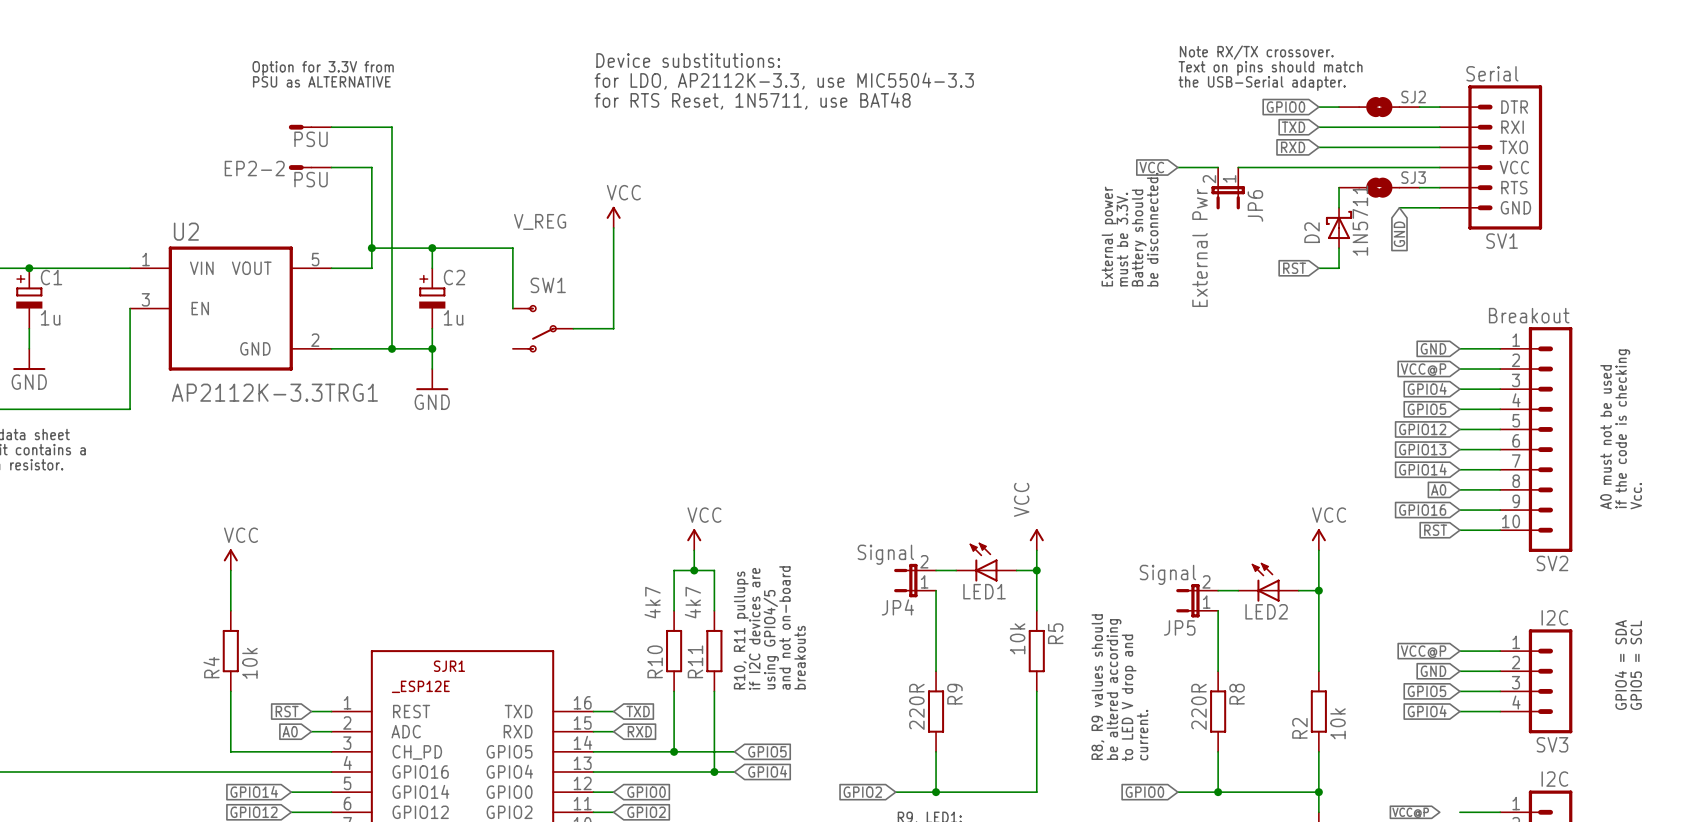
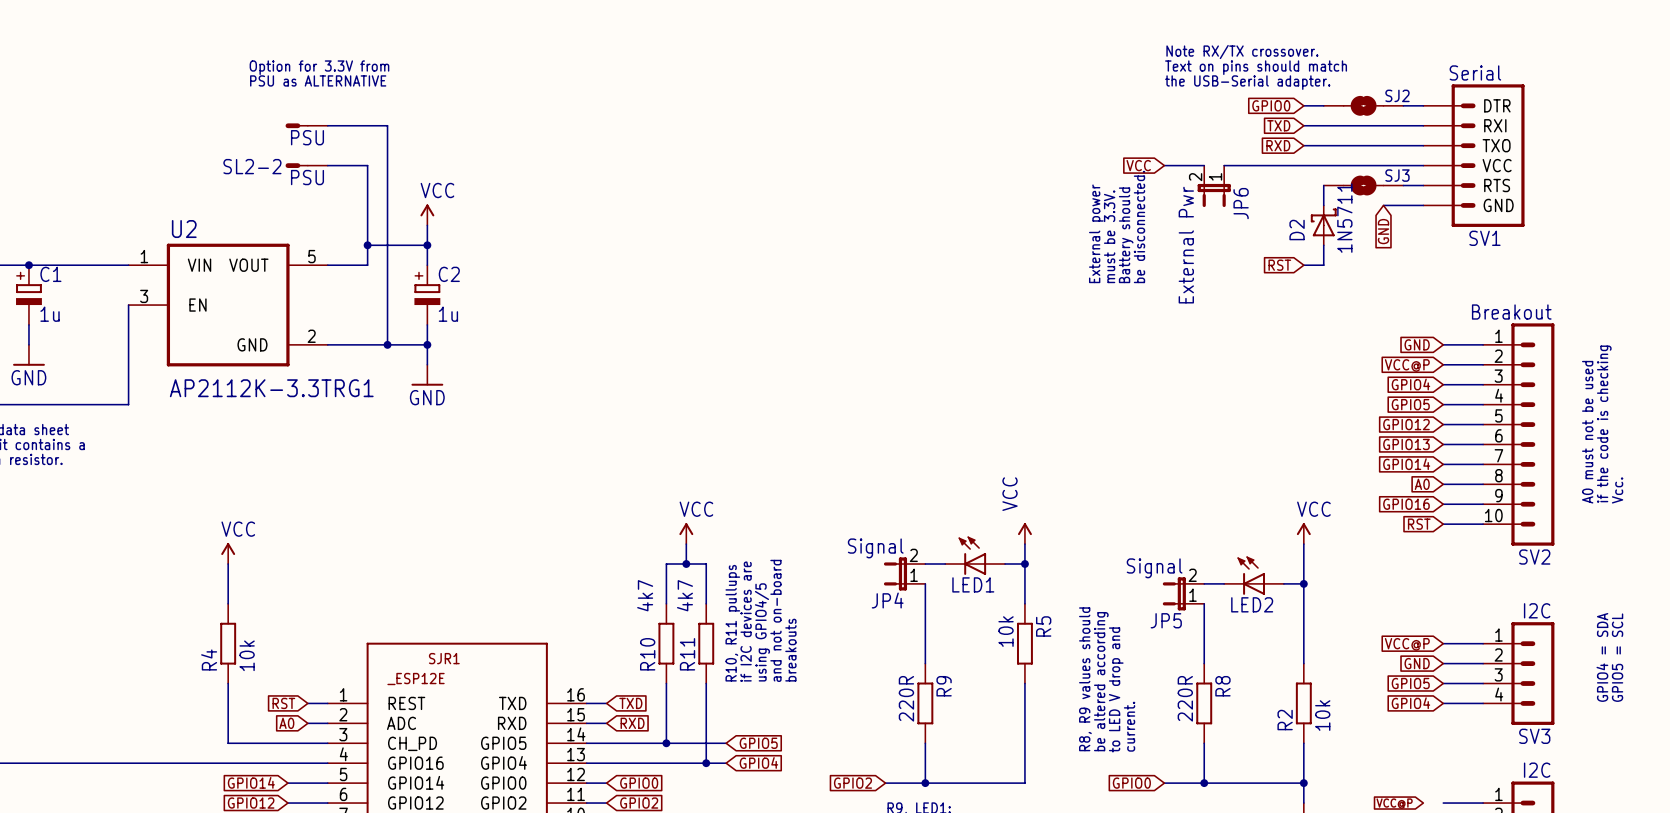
text: Device substitutions: (688, 60) -> none
text: for LDO, AP2112K-3.3, use MIC5504-3.3 (784, 81) -> none
text: for RTS Reset, 1N5711, use BAT48 (752, 101) -> none
EP2-2 name: EP2-2 (254, 168) -> SL2-2 (252, 166)
power symbol position: VCC (613, 217) -> VCC (427, 214)
label: V_REG (540, 221) -> none
wire: (613, 227) (613, 328) (573, 328) -> none
wire: (432, 248) (512, 248) (512, 308) -> (427, 245) (427, 225)
SW1: (543, 328) -> none

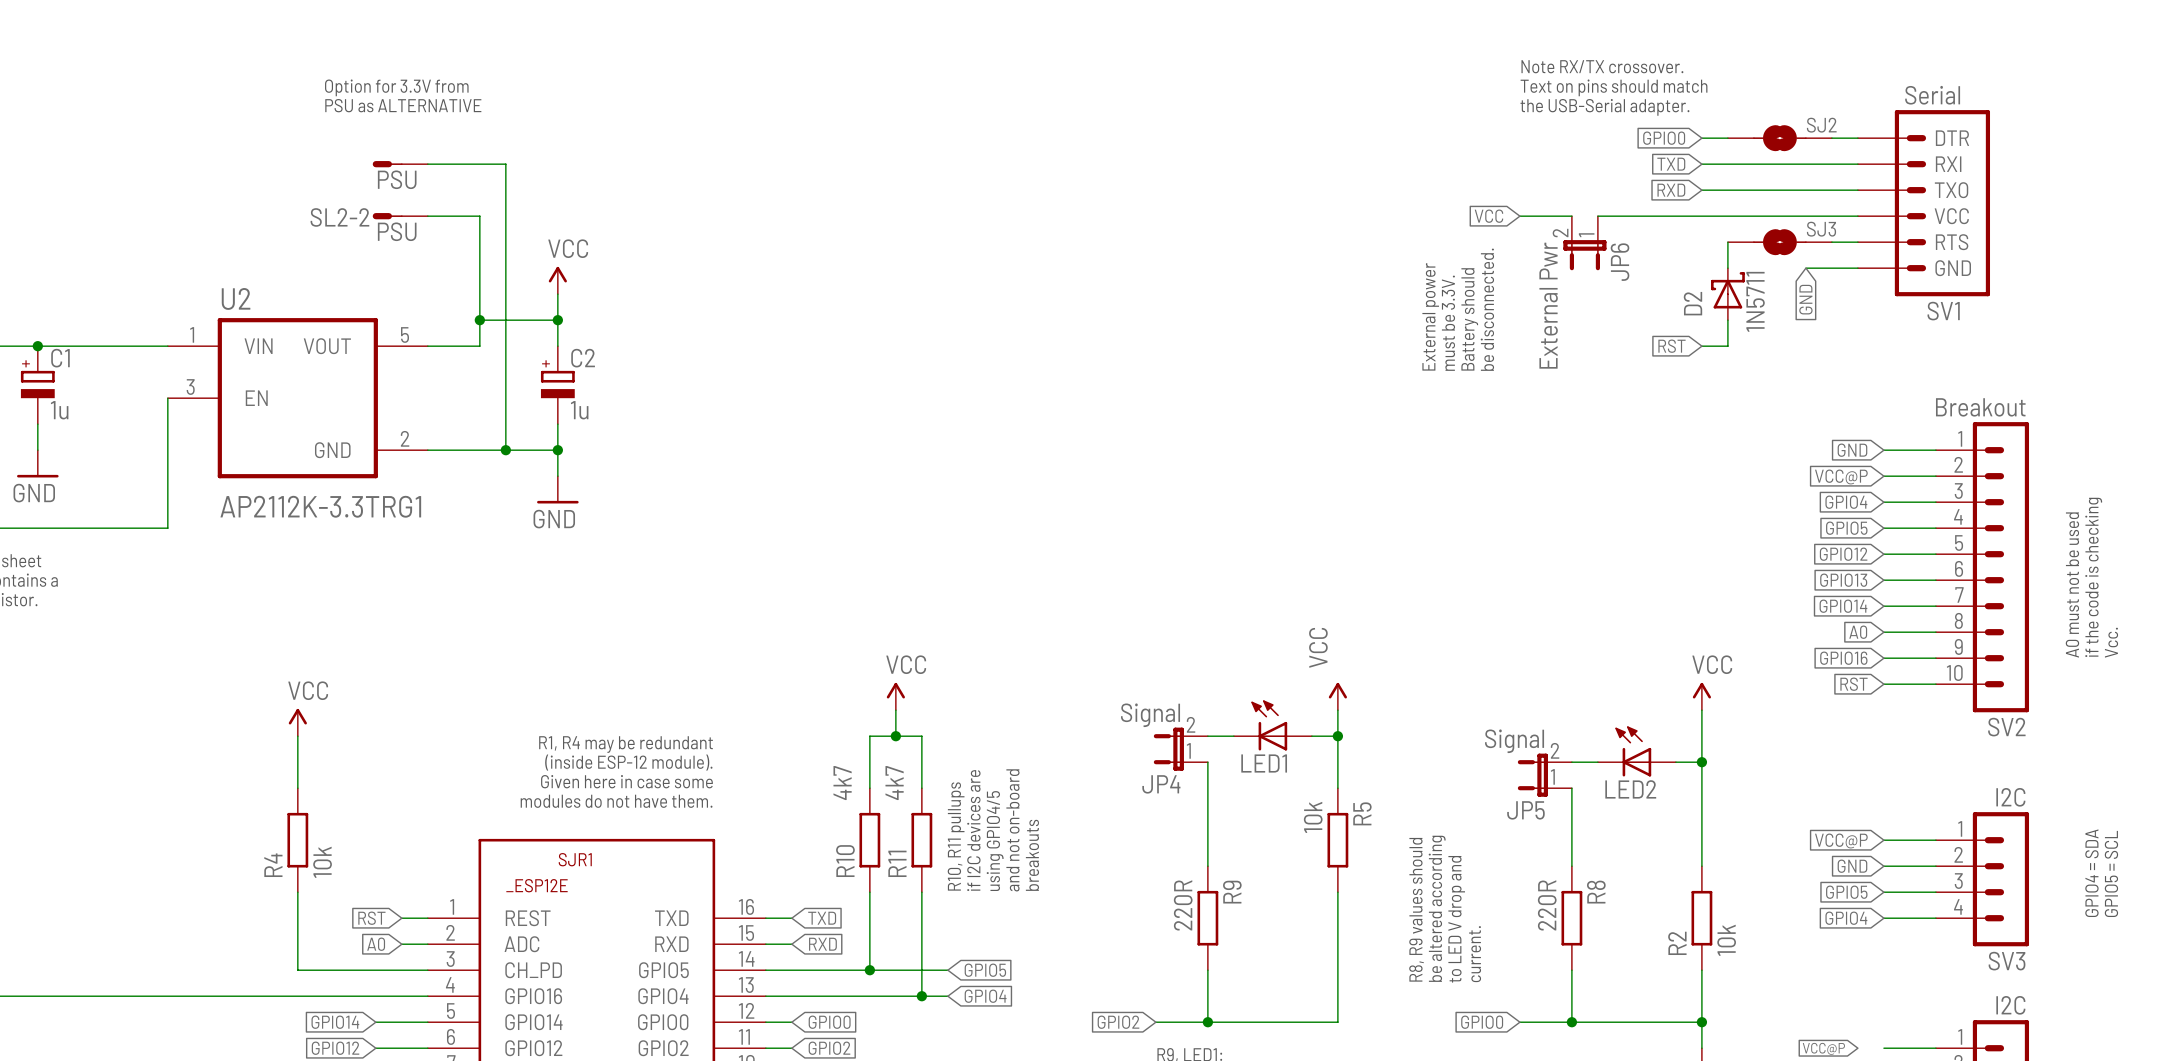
text: none -> R1, R4 may be redundant (626, 744)
text: none -> (inside ESP-12 module). (628, 762)
text: none -> Given here in case some (626, 781)
text: none -> modules do not have them. (616, 801)

